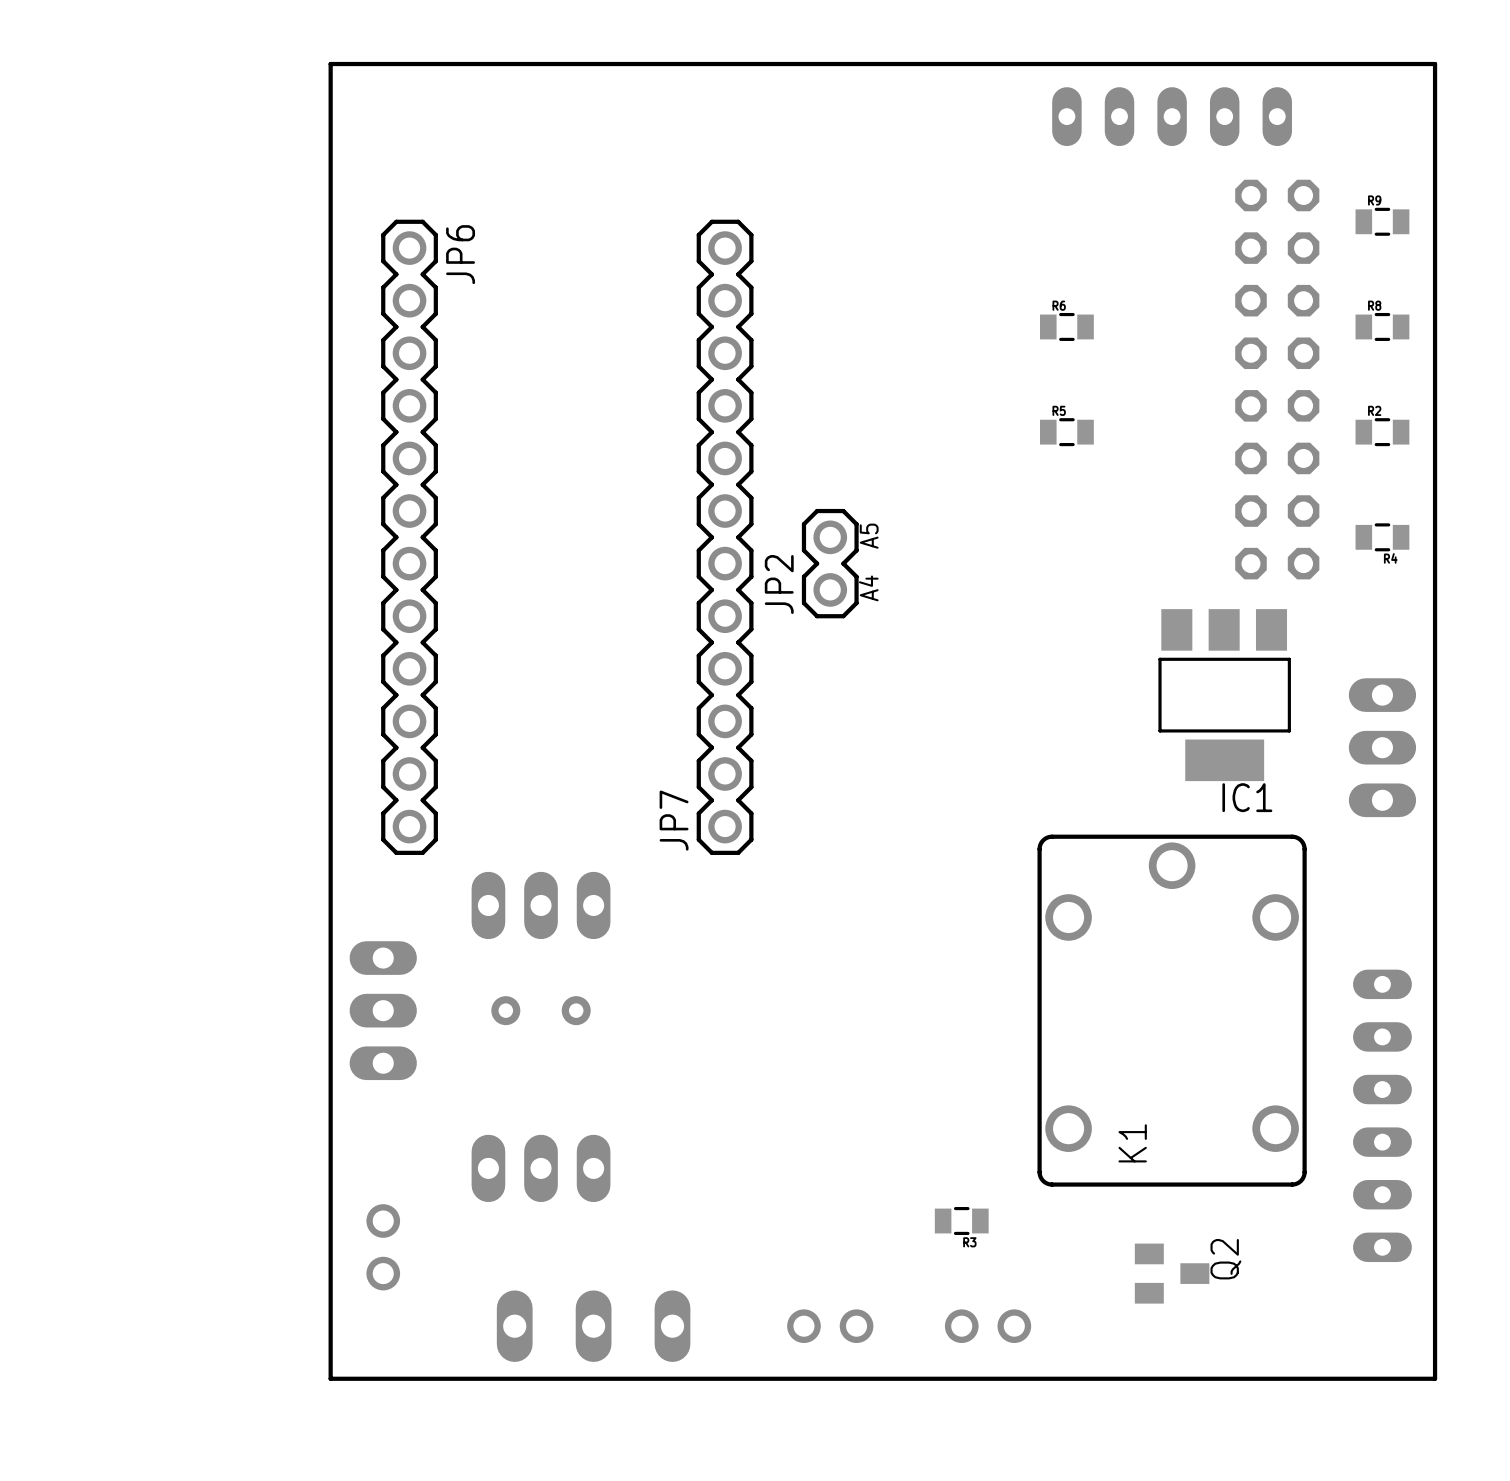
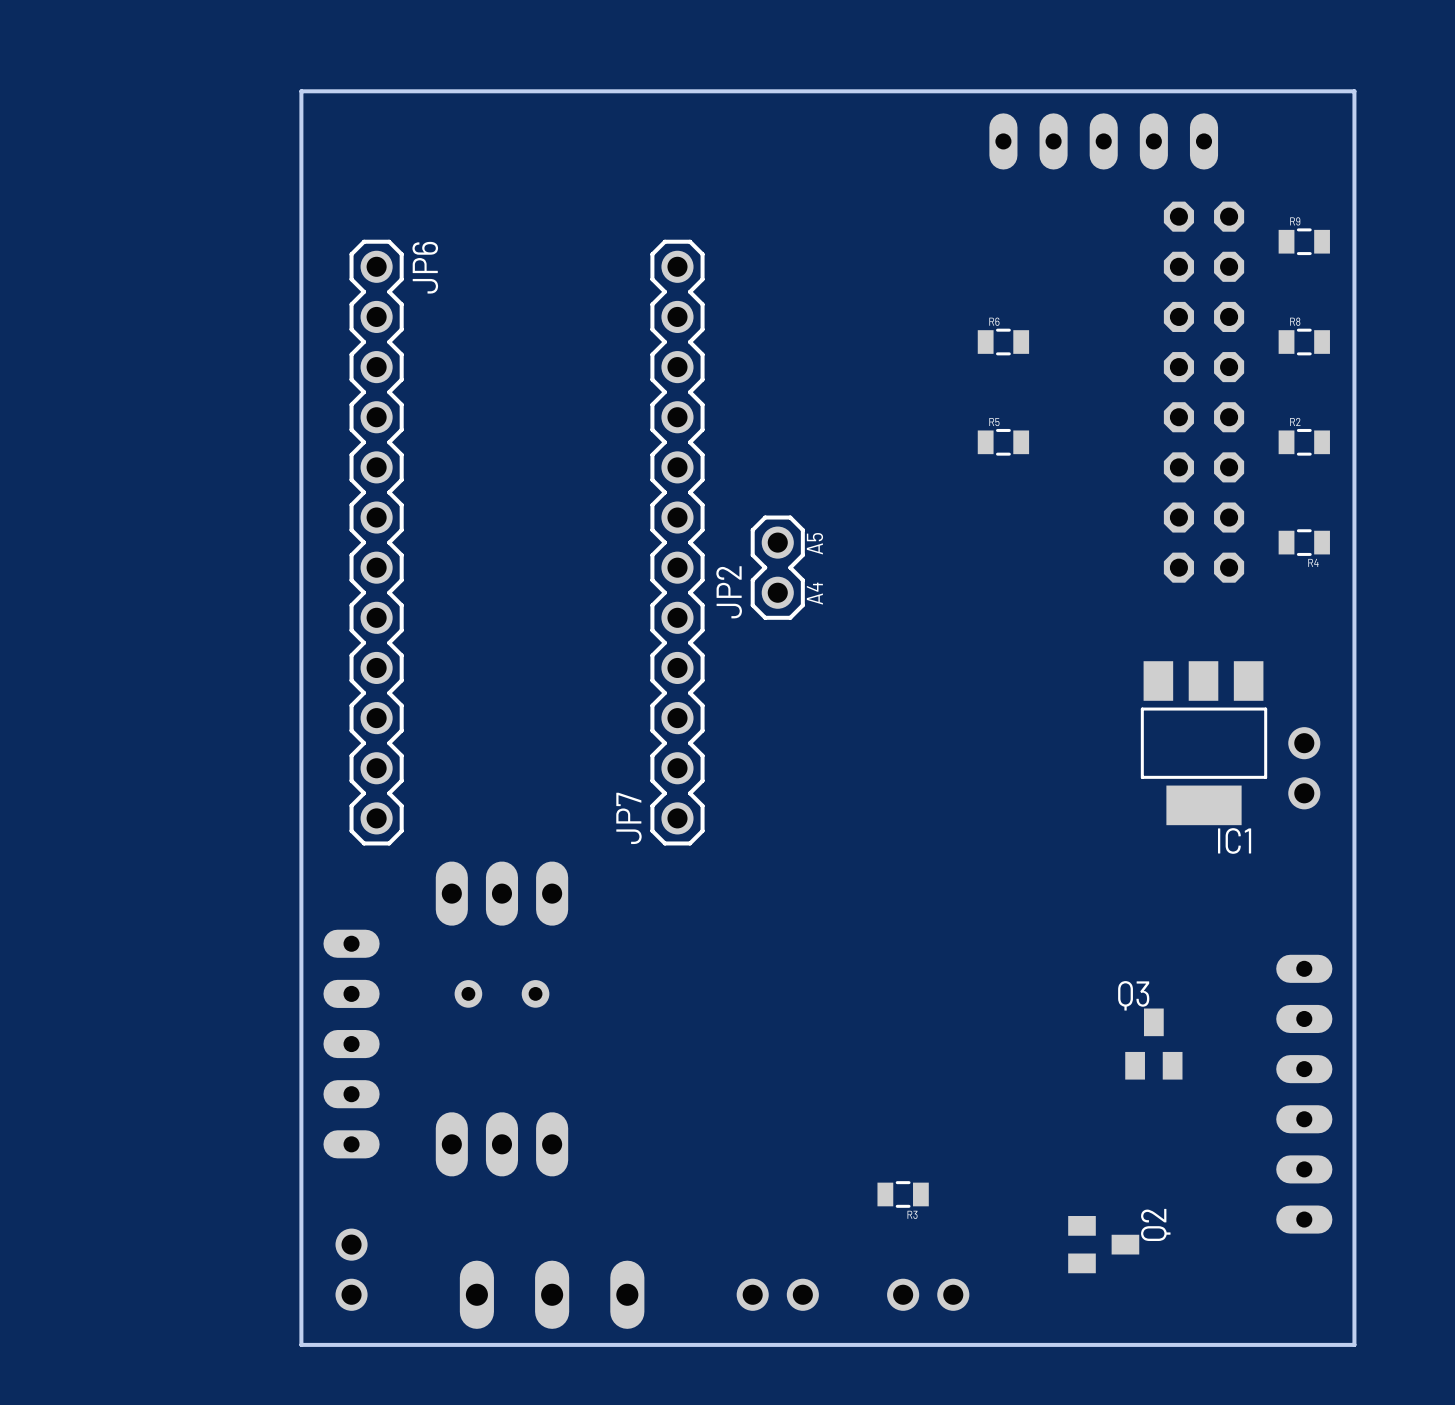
IC1 position: (1224, 695) -> (1204, 743)
part: (1382, 747) -> none
part: none -> (1304, 768)
part: (383, 1010) -> none
K1: (1172, 1010) -> none
part: none -> (351, 1044)
Q3: none -> (1153, 1044)
part position: (383, 1247) -> (351, 1269)

